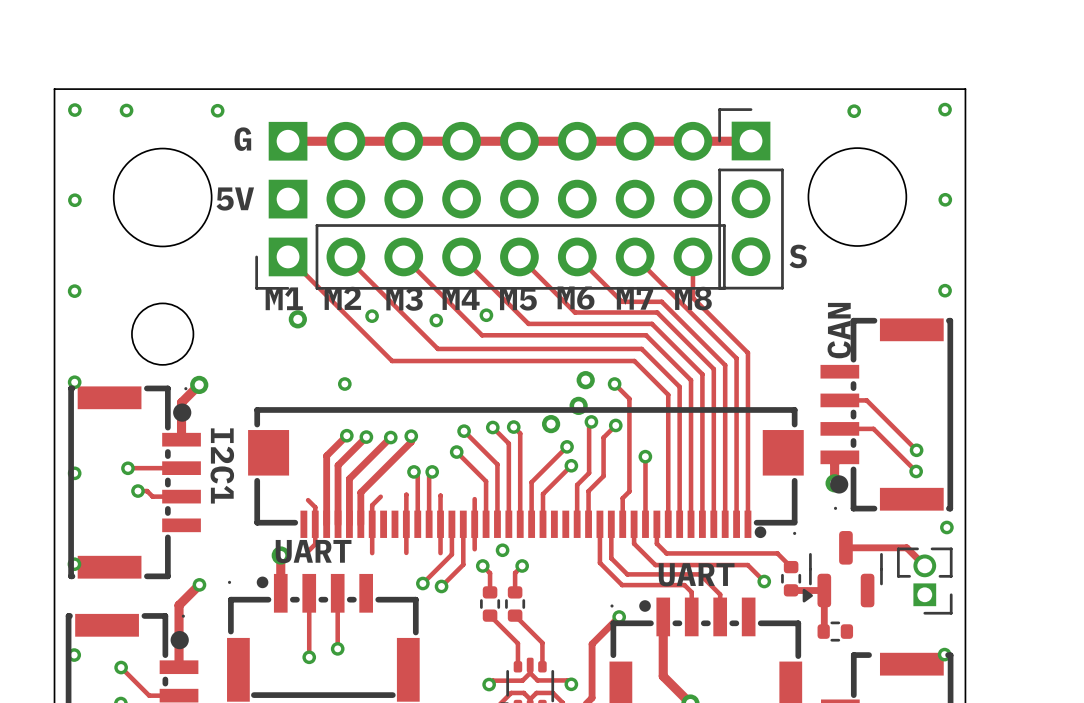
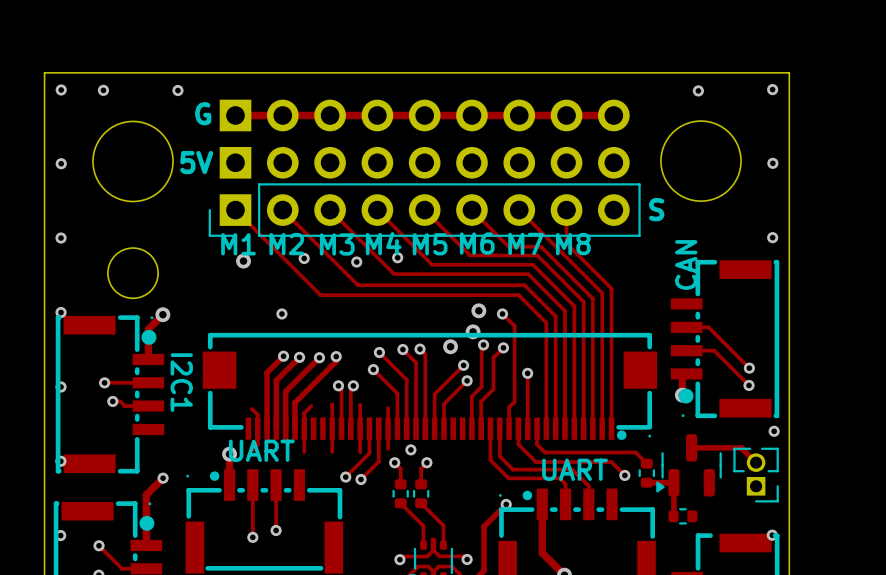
part: none -> (424, 115)
part: (751, 198) -> none
part: none -> (424, 162)
part: (490, 256) -> none
part: none -> (424, 210)

